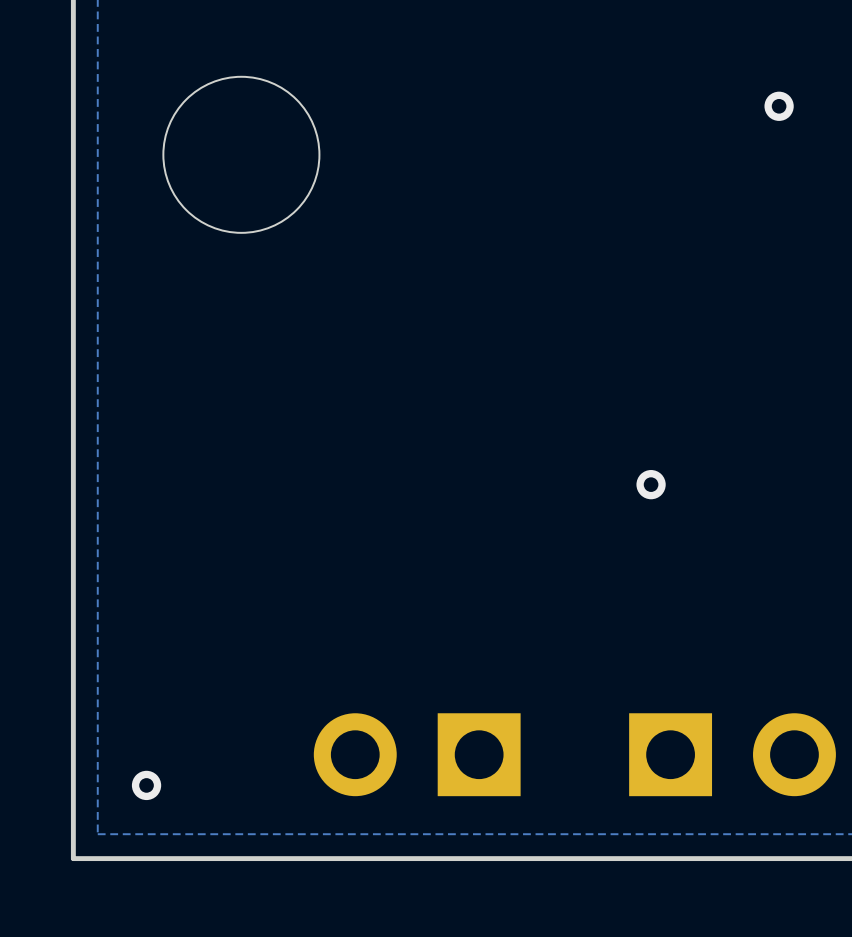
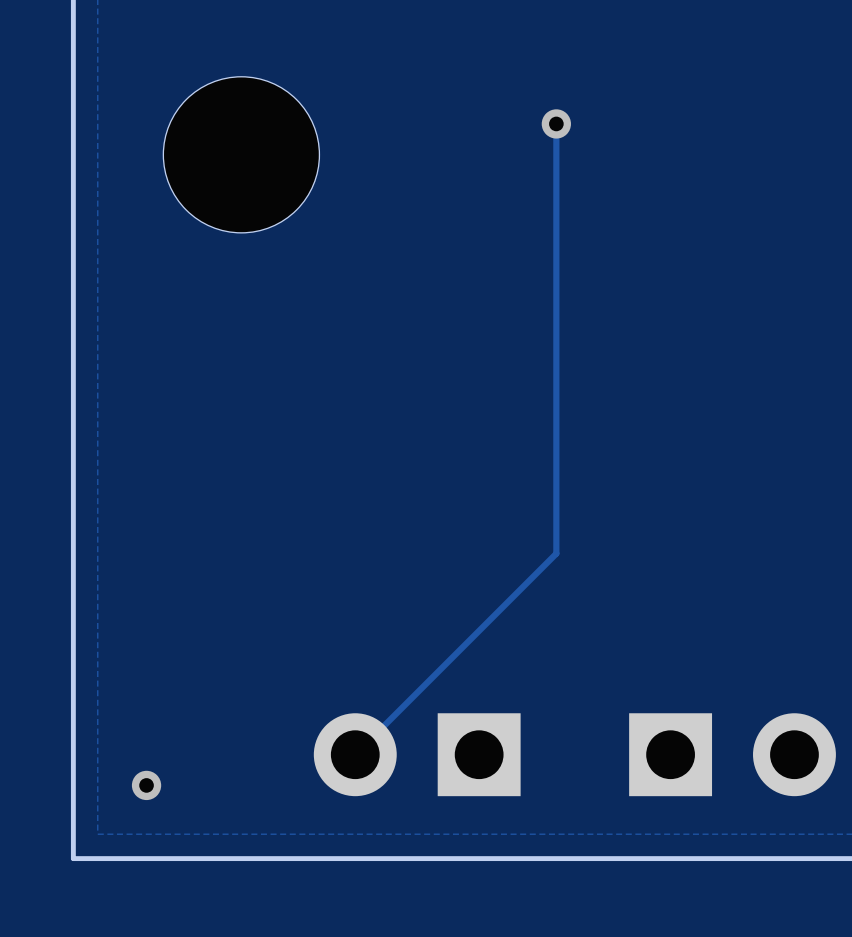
via: (779, 106) -> none
track: none -> (556, 123) (556, 553) (355, 754)
via: none -> (556, 123)
via: (651, 484) -> none

